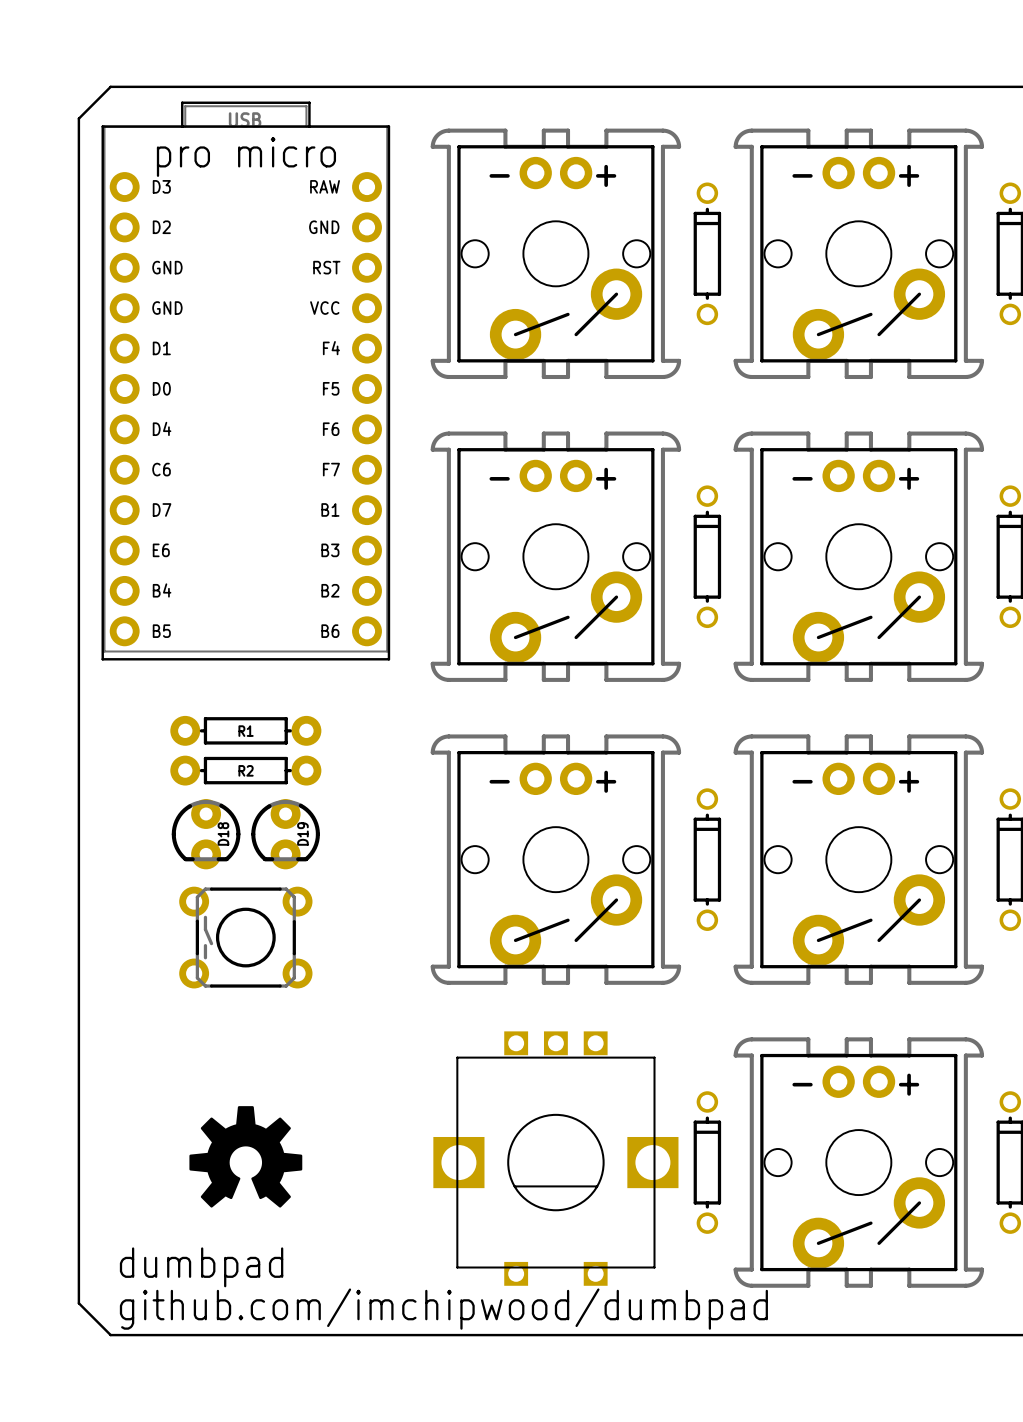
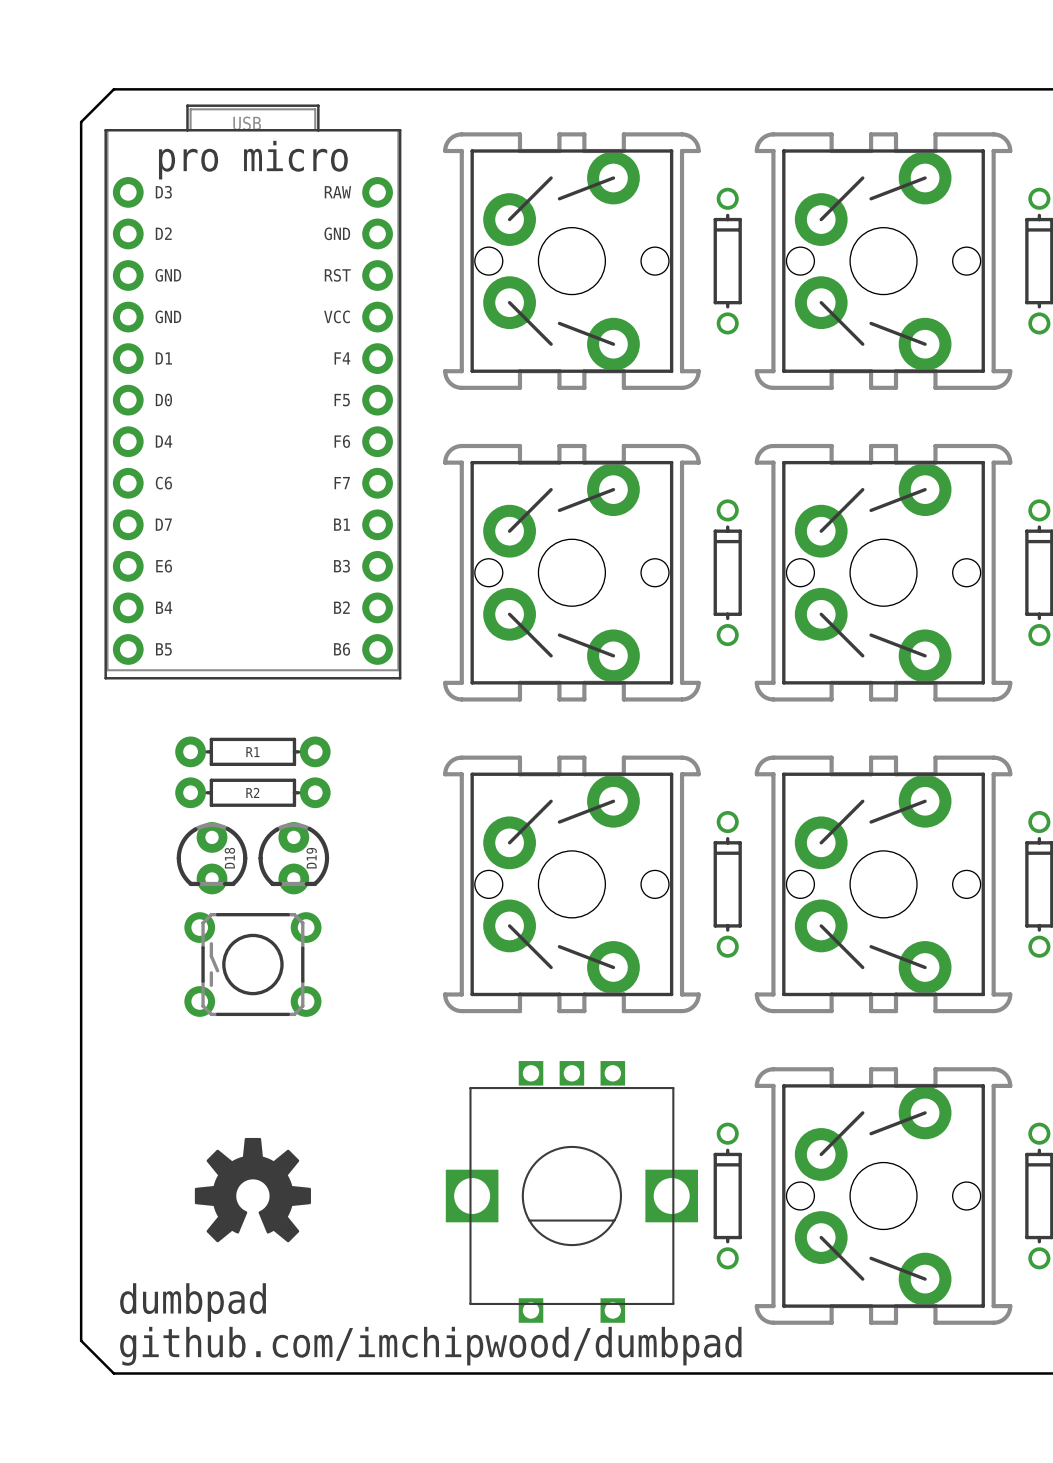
part footprint: [430, 128, 682, 380] -> [443, 132, 701, 390]
part footprint: [733, 128, 985, 380] -> [754, 132, 1013, 390]
part footprint: [430, 431, 682, 682] -> [443, 443, 701, 702]
part footprint: [733, 431, 985, 682] -> [754, 443, 1013, 702]
part footprint: [430, 734, 682, 985] -> [443, 755, 701, 1014]
part footprint: [733, 734, 985, 985] -> [754, 755, 1013, 1014]
part footprint: [733, 1037, 985, 1288] -> [754, 1067, 1013, 1325]

